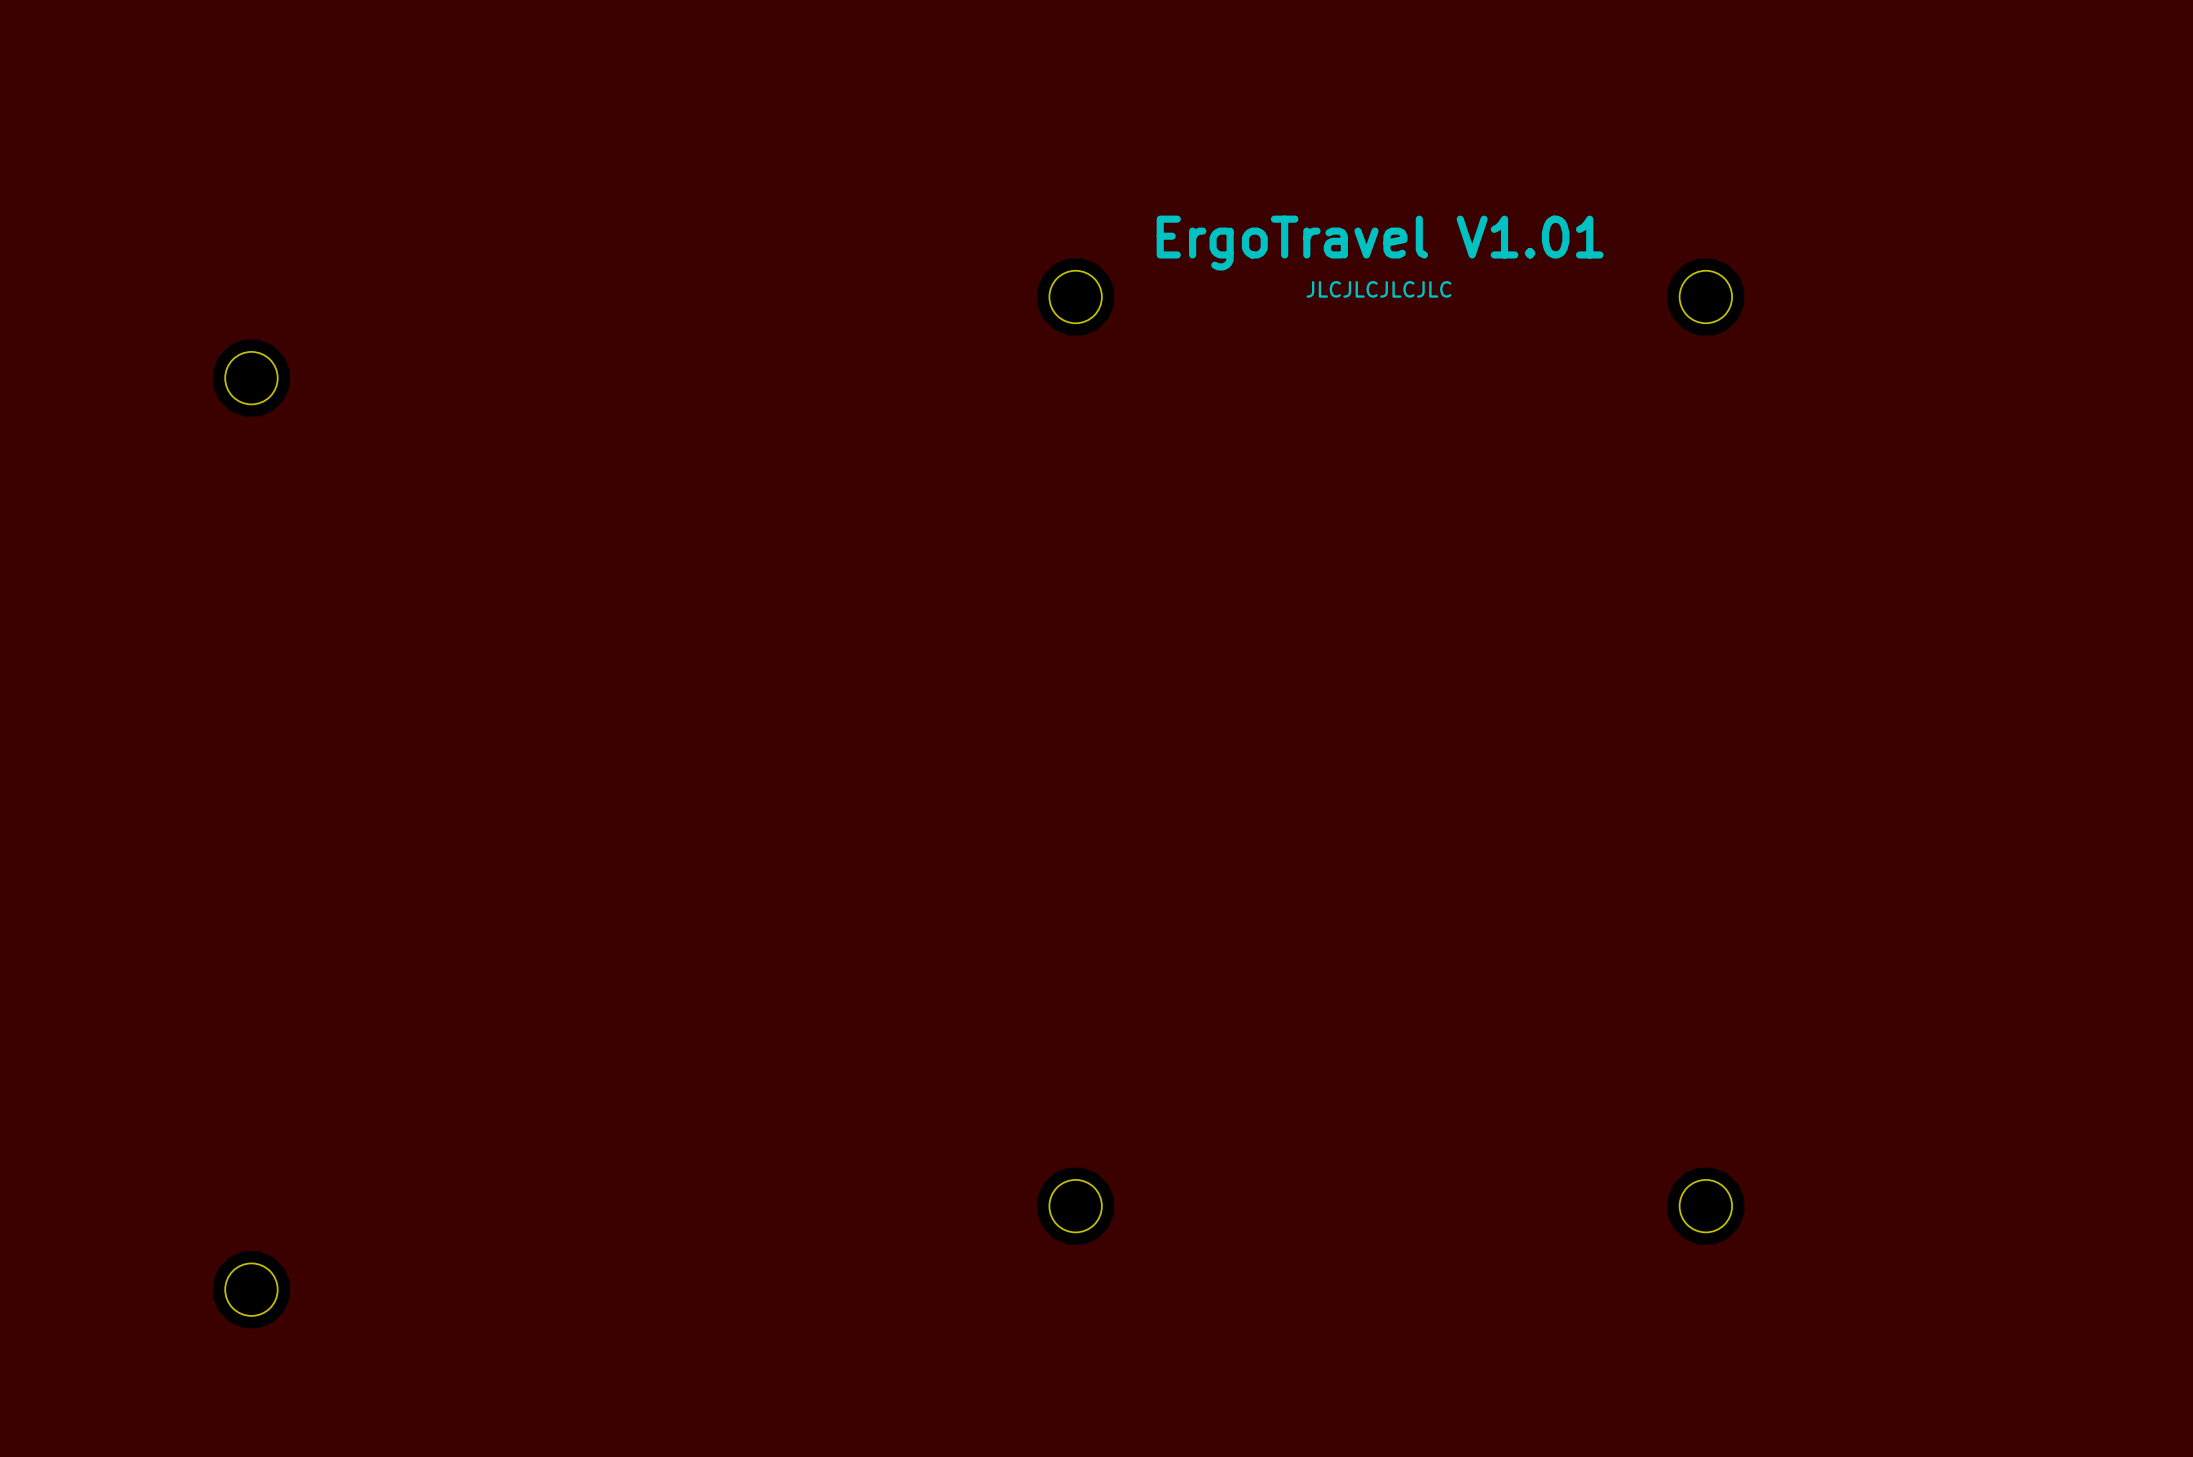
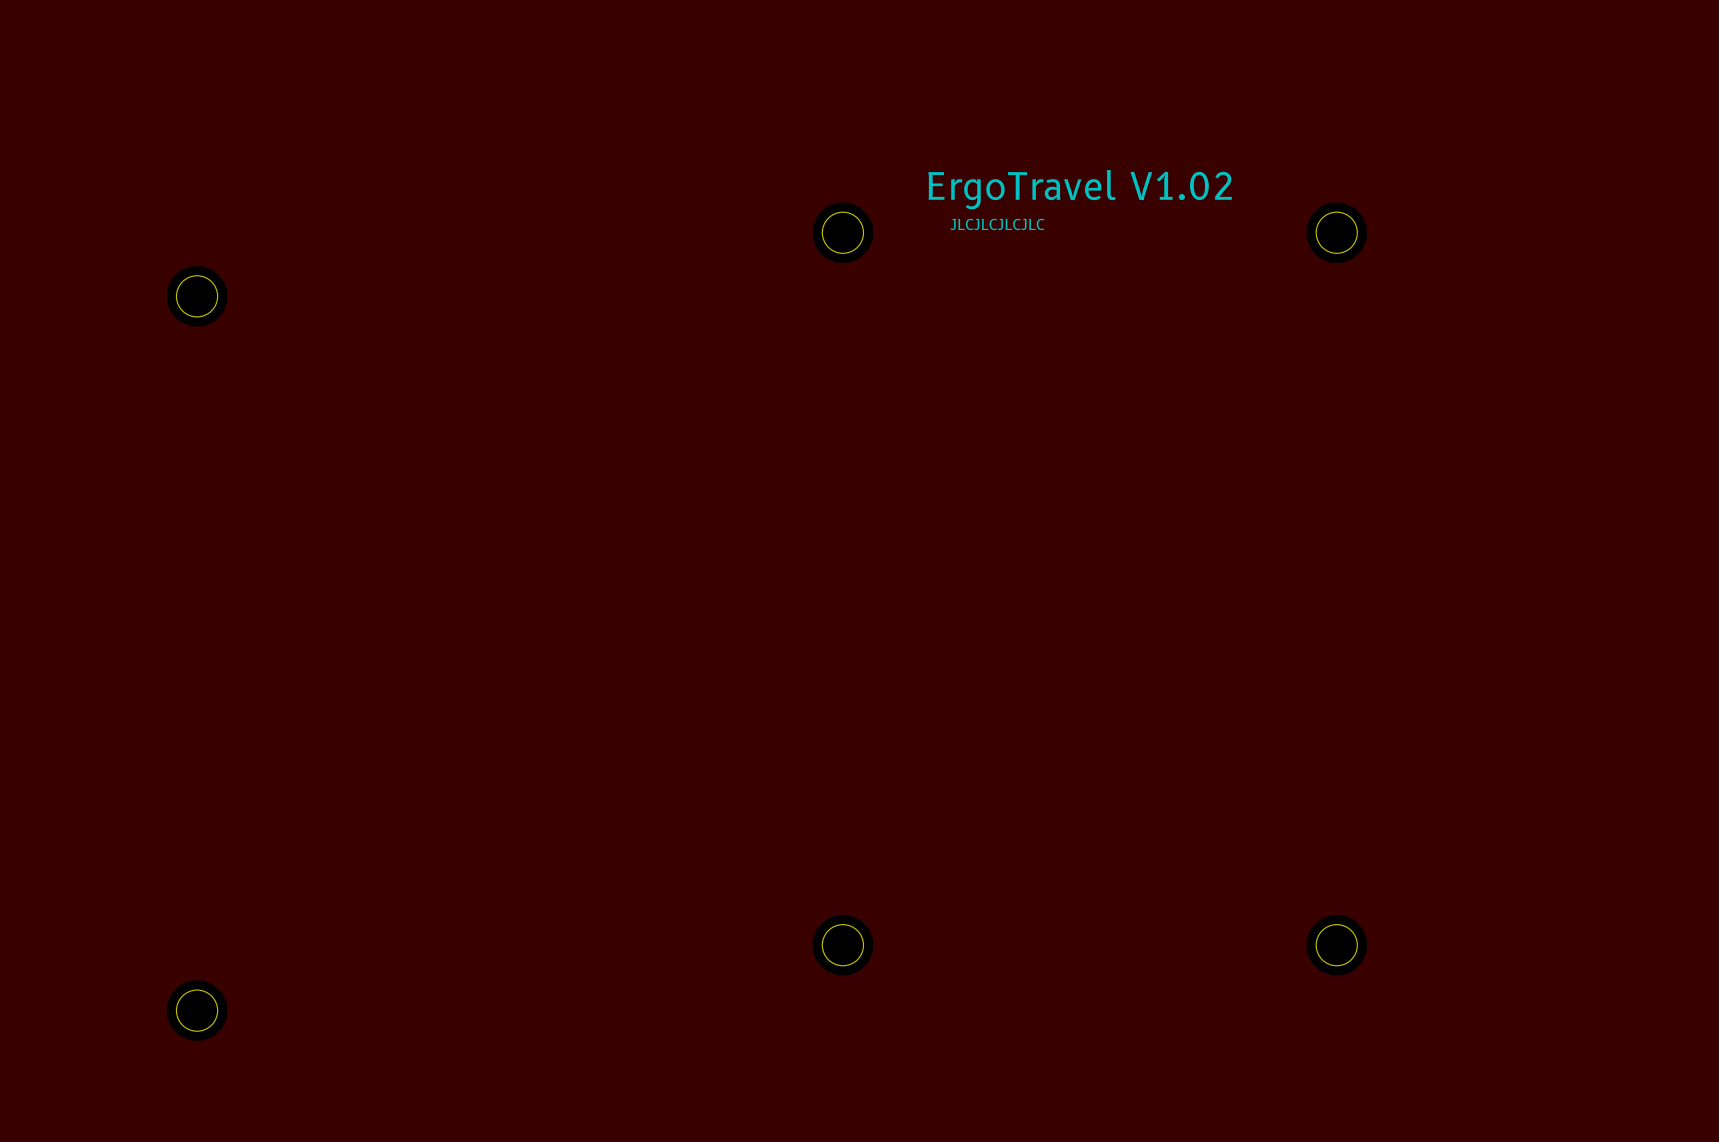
text: ErgoTravel V1.01 (1380, 243) -> ErgoTravel V1.02 (1080, 189)
text position: JLCJLCJLCJLC (1378, 289) -> JLCJLCJLCJLC (997, 224)

